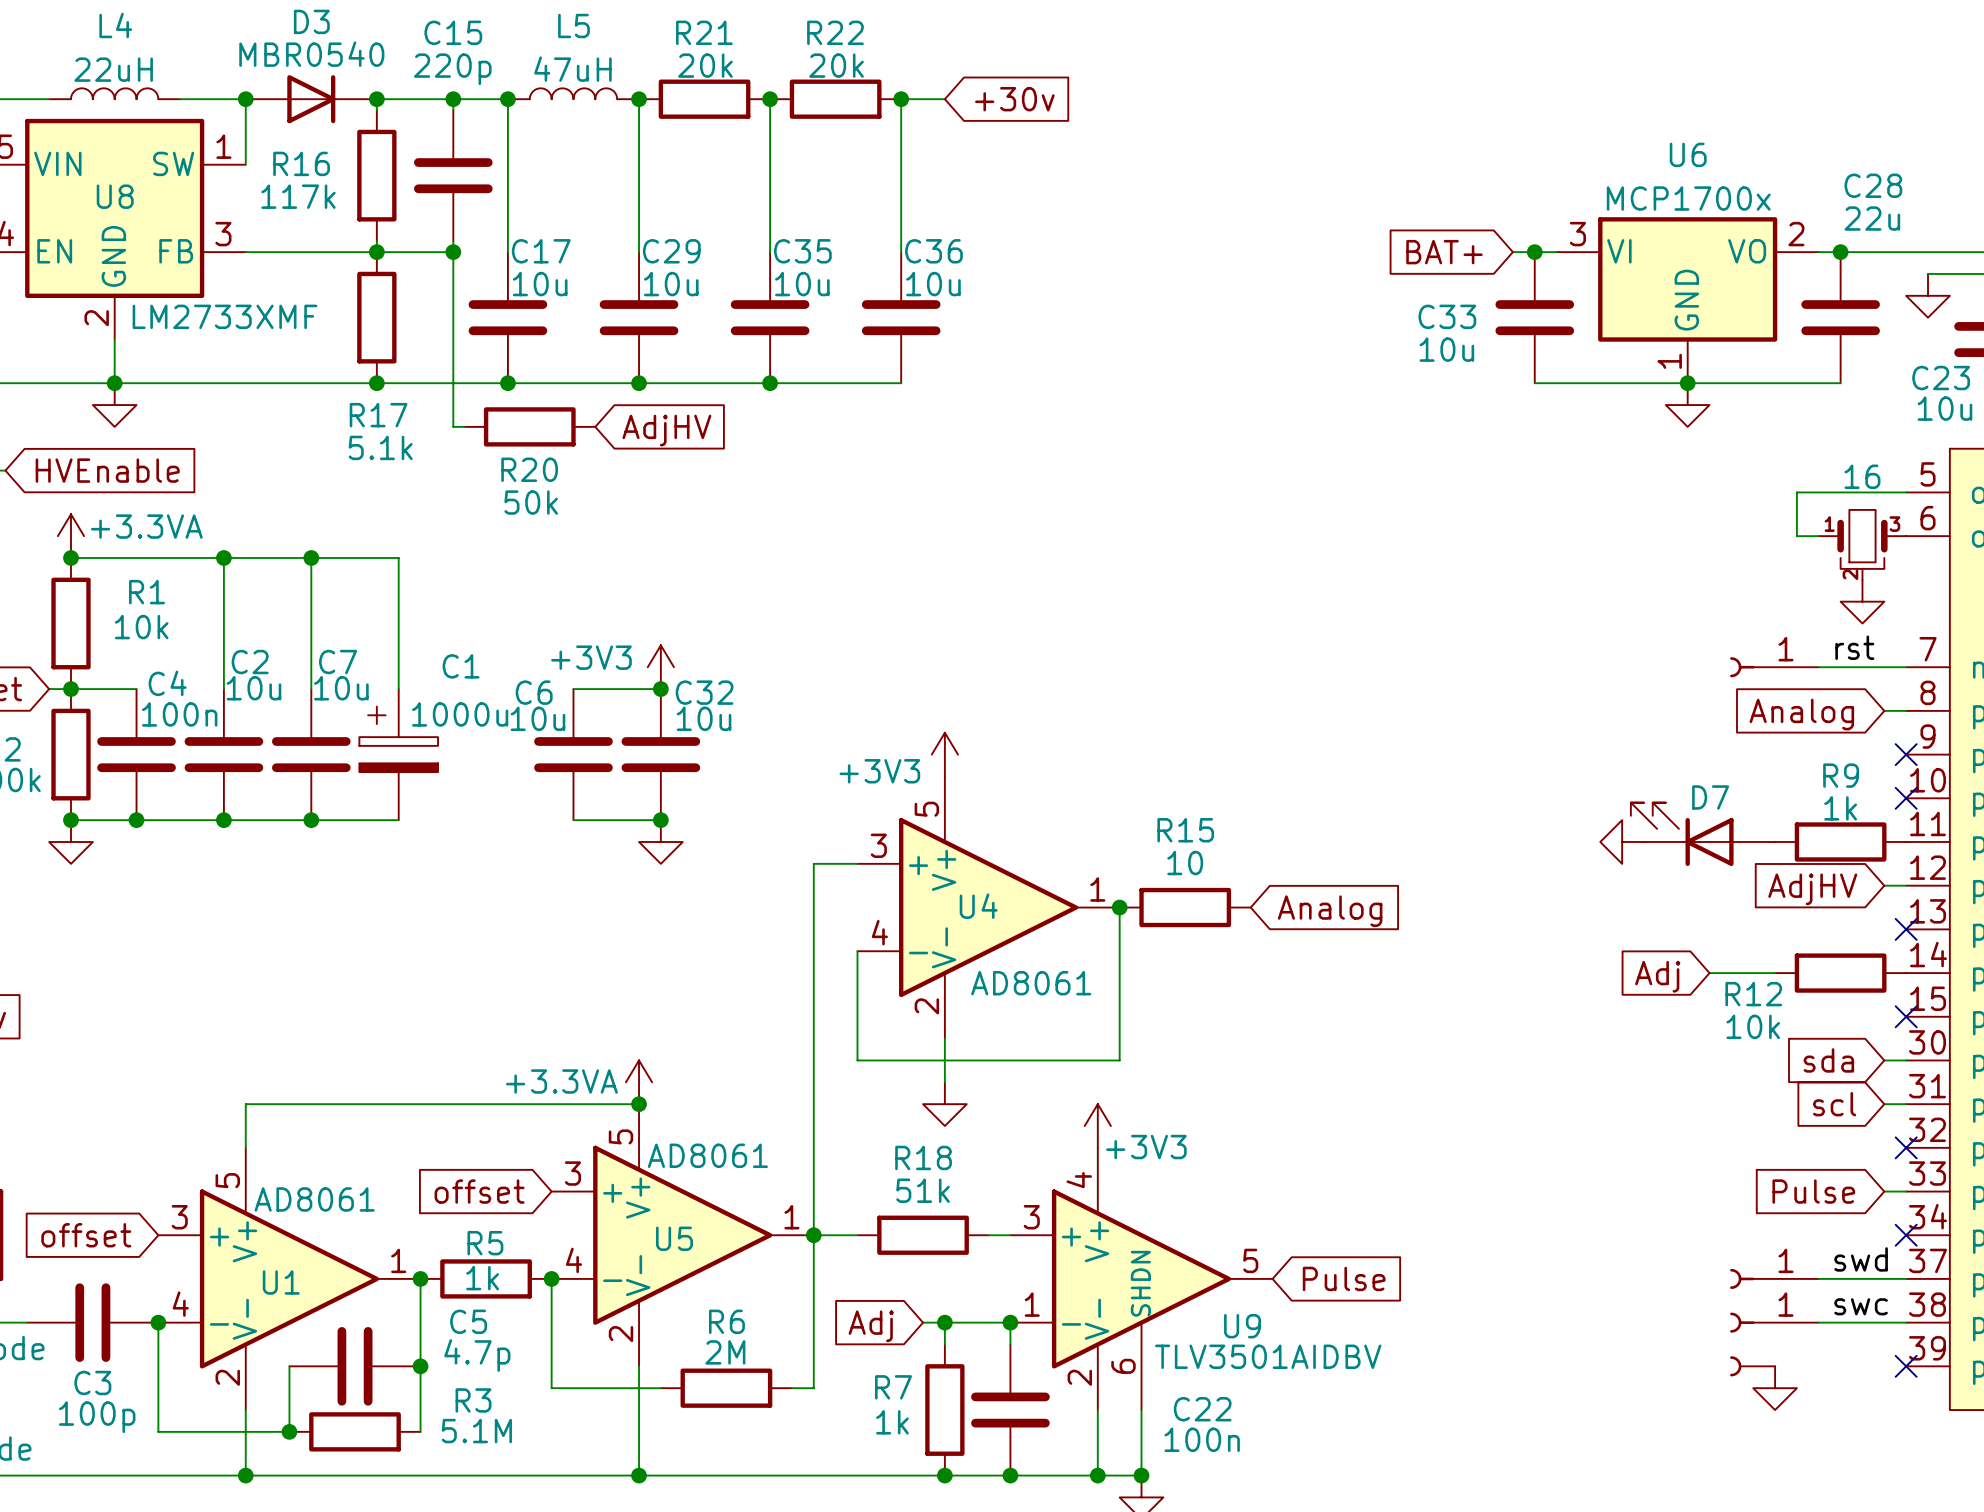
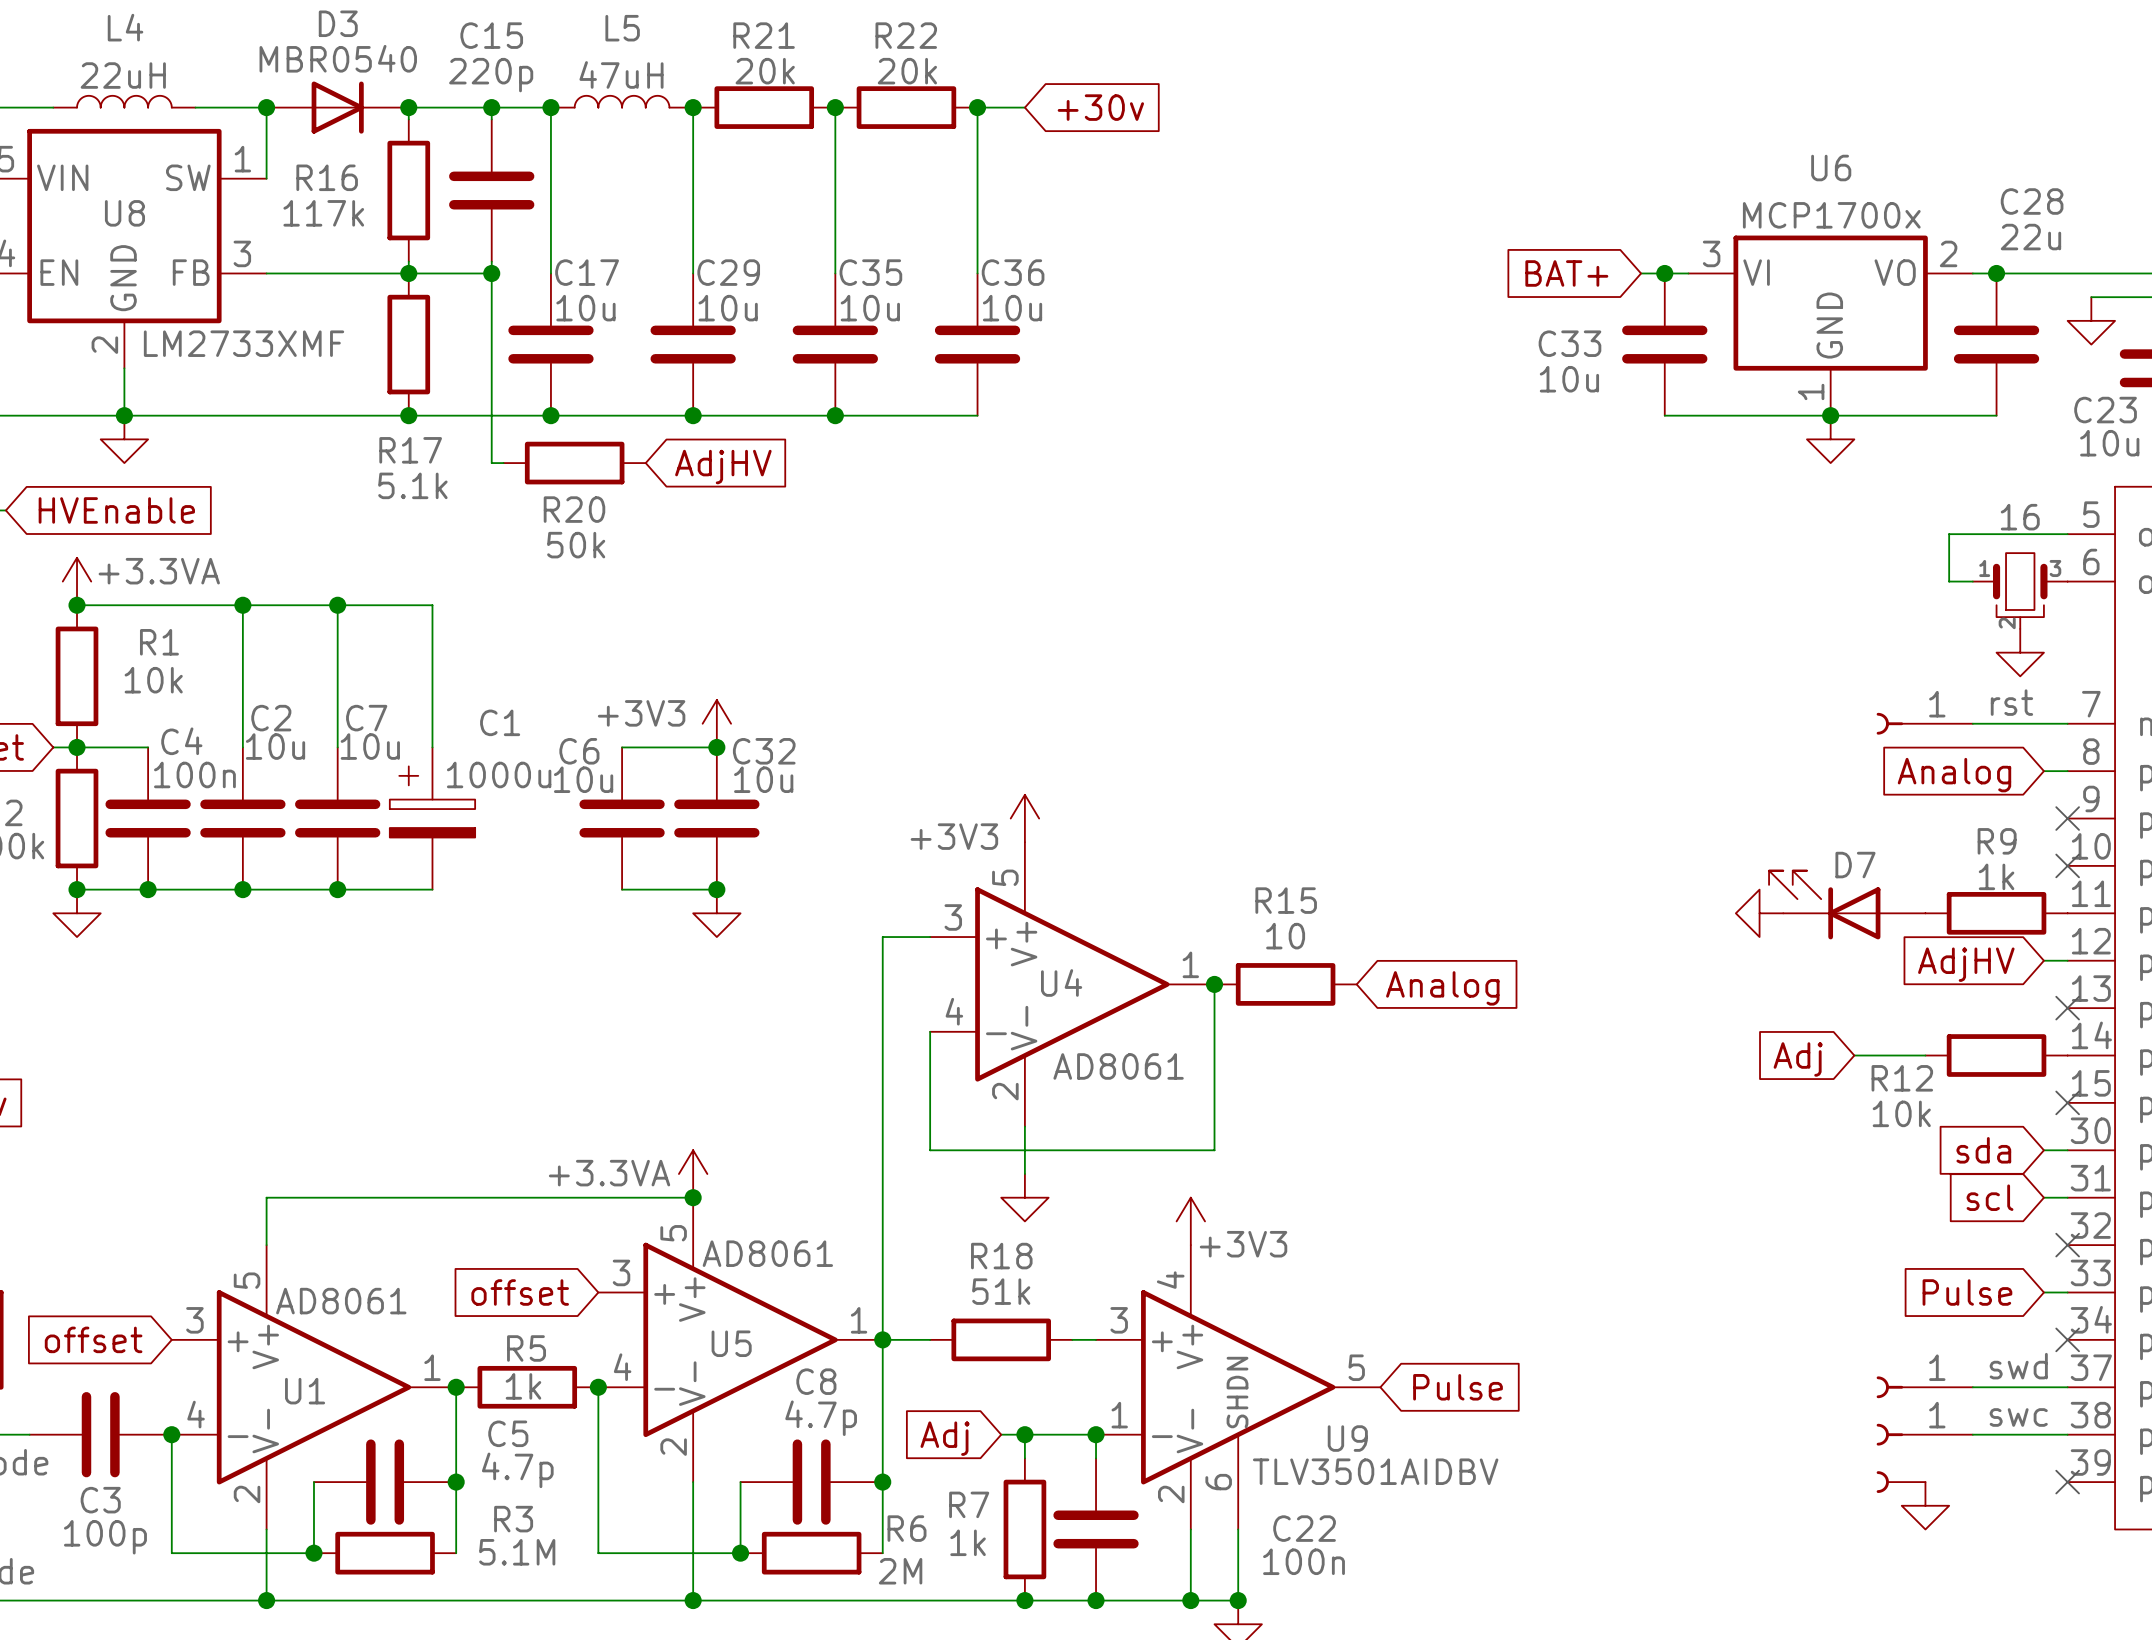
R6 name position: R6 (726, 1321) -> R6 (907, 1528)
R6 value position: 2M (725, 1352) -> 2M (900, 1571)
C8: none -> 4.7p (811, 1482)
junction: none -> (882, 1482)
wire: (551, 1388) (660, 1388) -> (598, 1505) (598, 1553) (740, 1553) (740, 1482)
R6 position: (726, 1388) -> (811, 1553)
wire: (791, 1388) (813, 1388) -> (882, 1553) (882, 1505)
junction: none -> (740, 1553)

